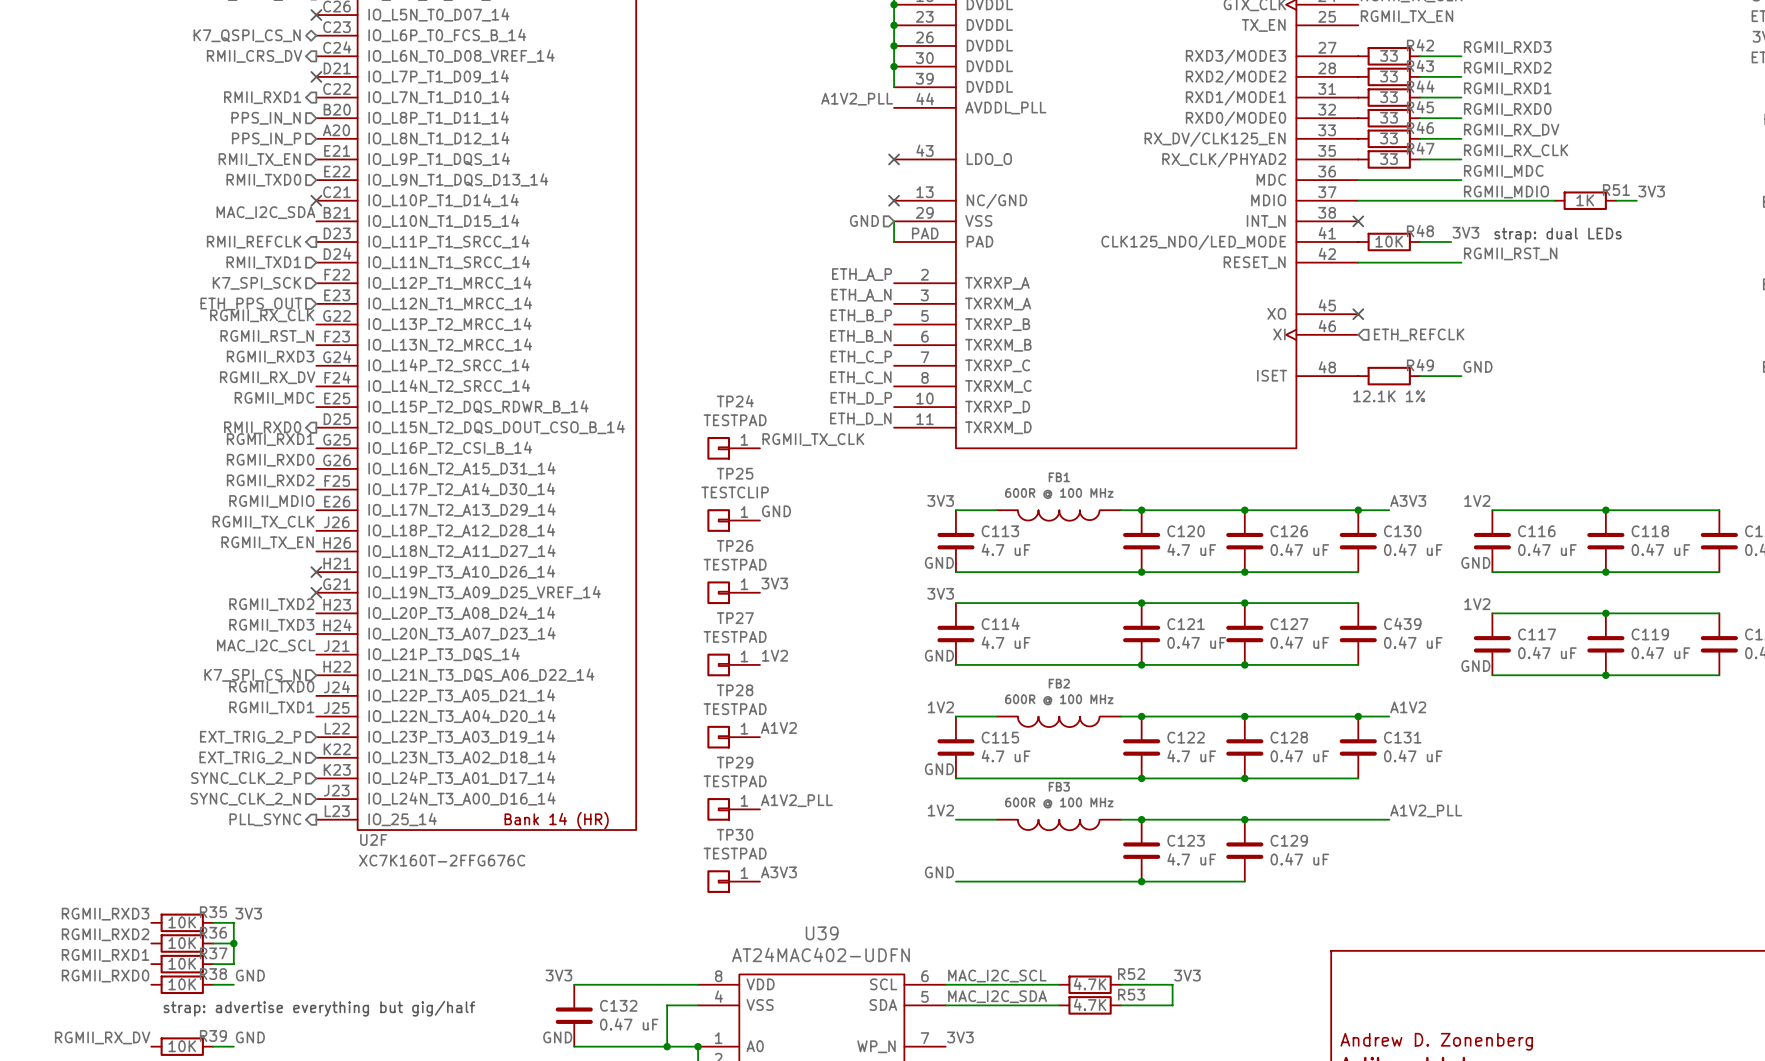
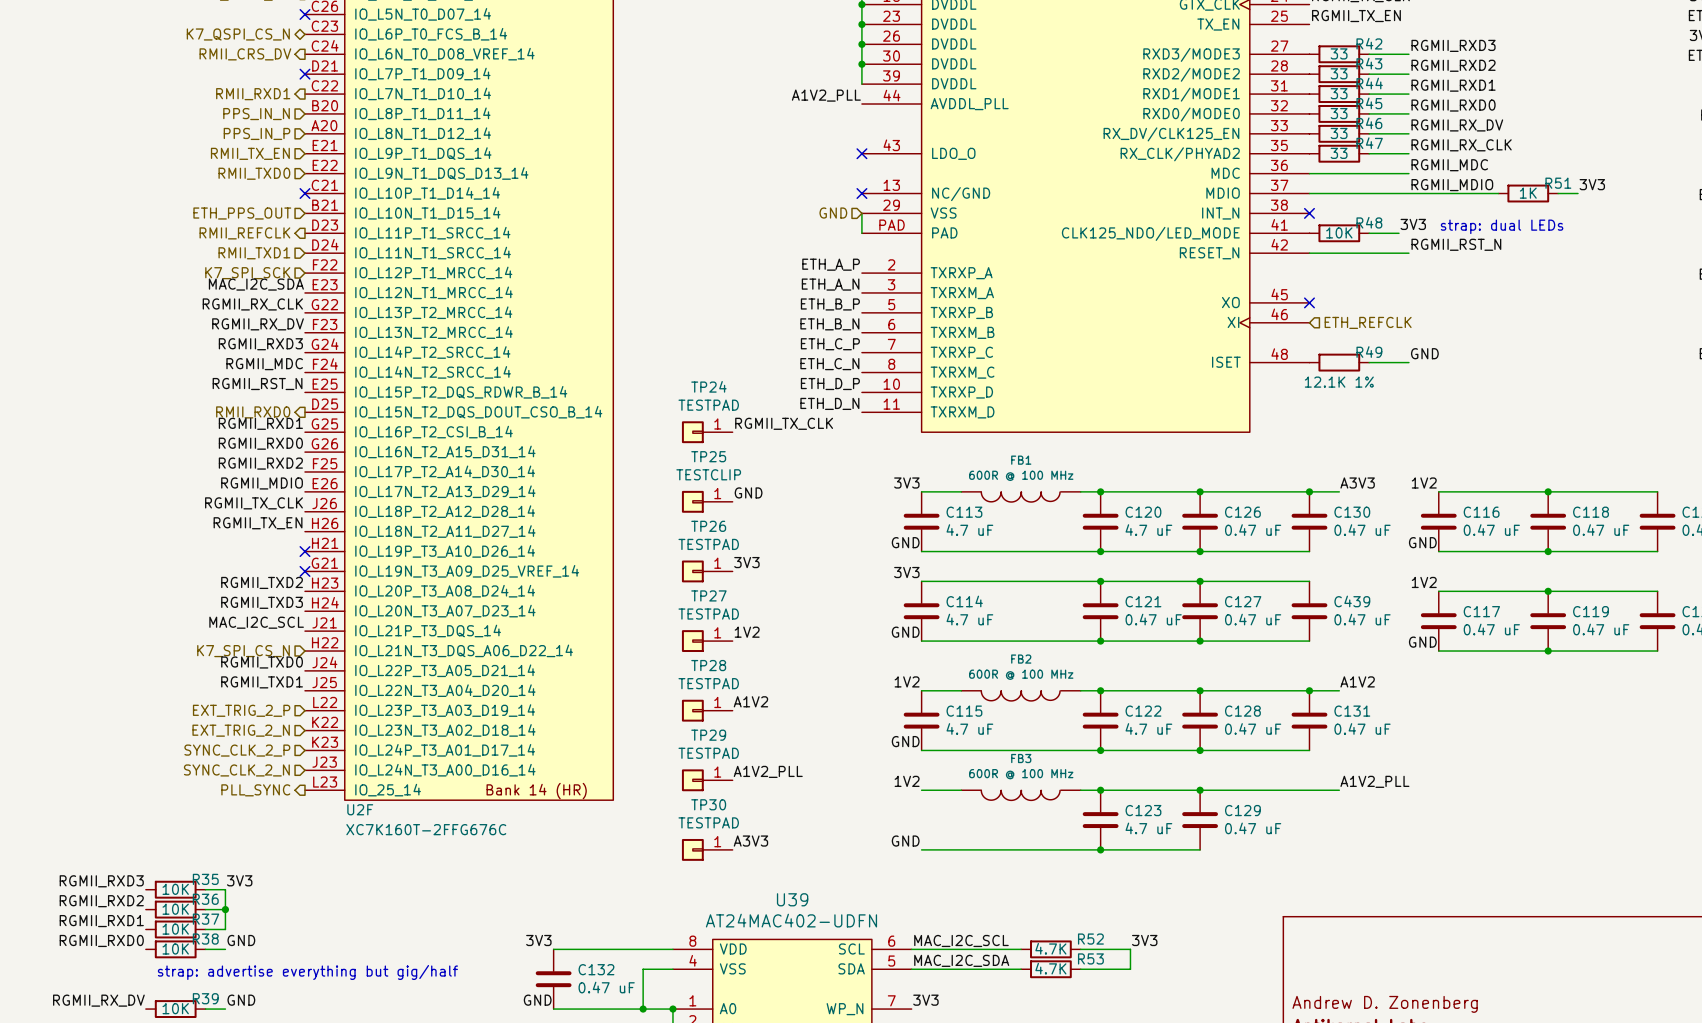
label position: MAC_I2C_SDA (265, 212) -> MAC_I2C_SDA (256, 284)
hierarchical label position: ETH_PPS_OUT (251, 303) -> ETH_PPS_OUT (242, 213)
label: RGMII_RST_N (267, 336) -> RGMII_RX_DV (258, 324)
label: RGMII_RX_DV (267, 377) -> RGMII_MDC (264, 364)
label: RGMII_MDC (274, 398) -> RGMII_RST_N (257, 384)

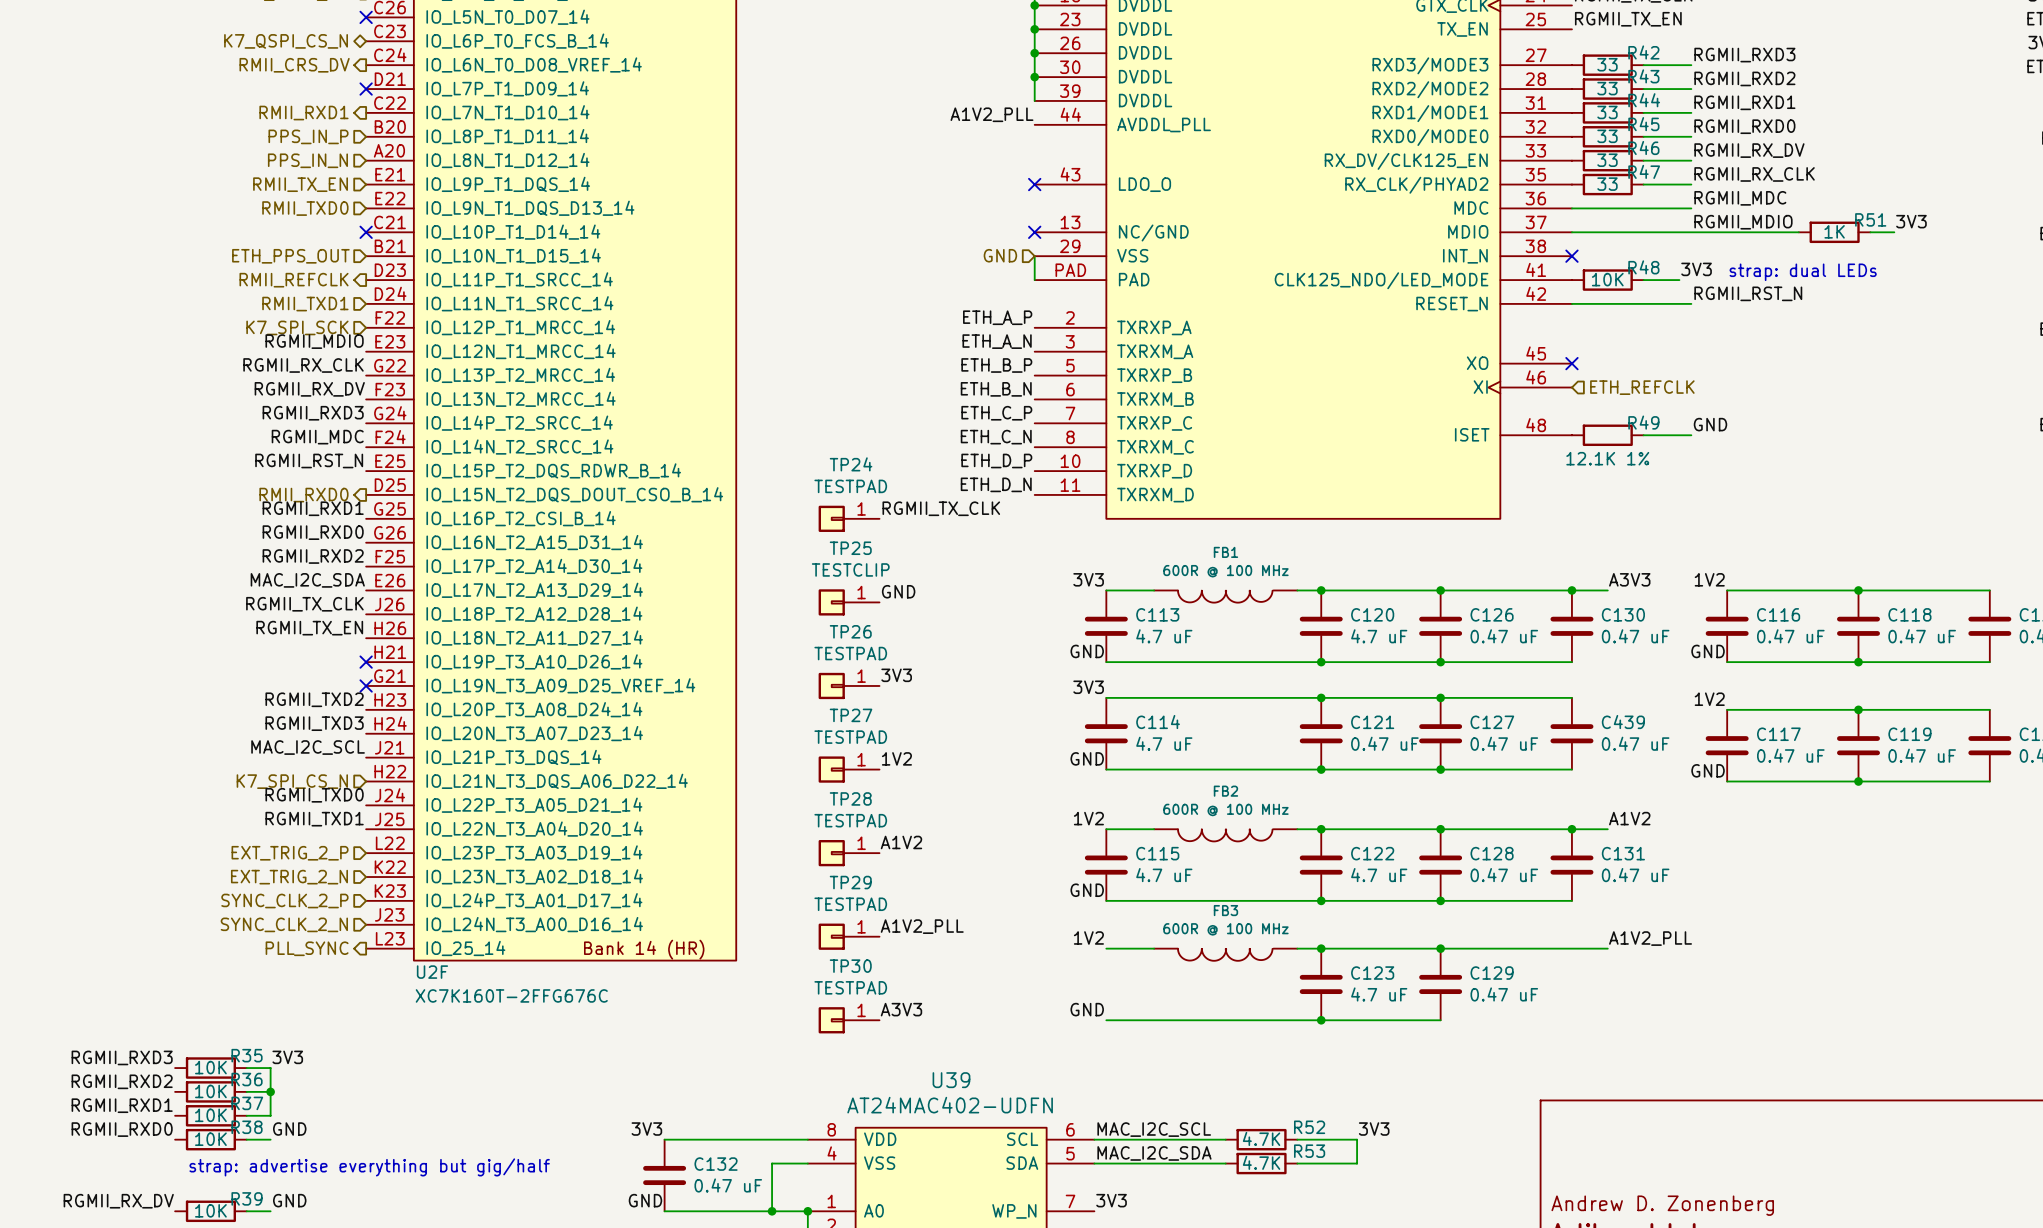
hierarchical label: PPS_IN_N (256, 114) -> PPS_IN_P (308, 136)
hierarchical label: PPS_IN_P (257, 133) -> PPS_IN_N (307, 160)
label: MAC_I2C_SDA (256, 284) -> RGMII_MDIO (314, 341)
label: RGMII_MDIO (262, 483) -> MAC_I2C_SDA (307, 580)

